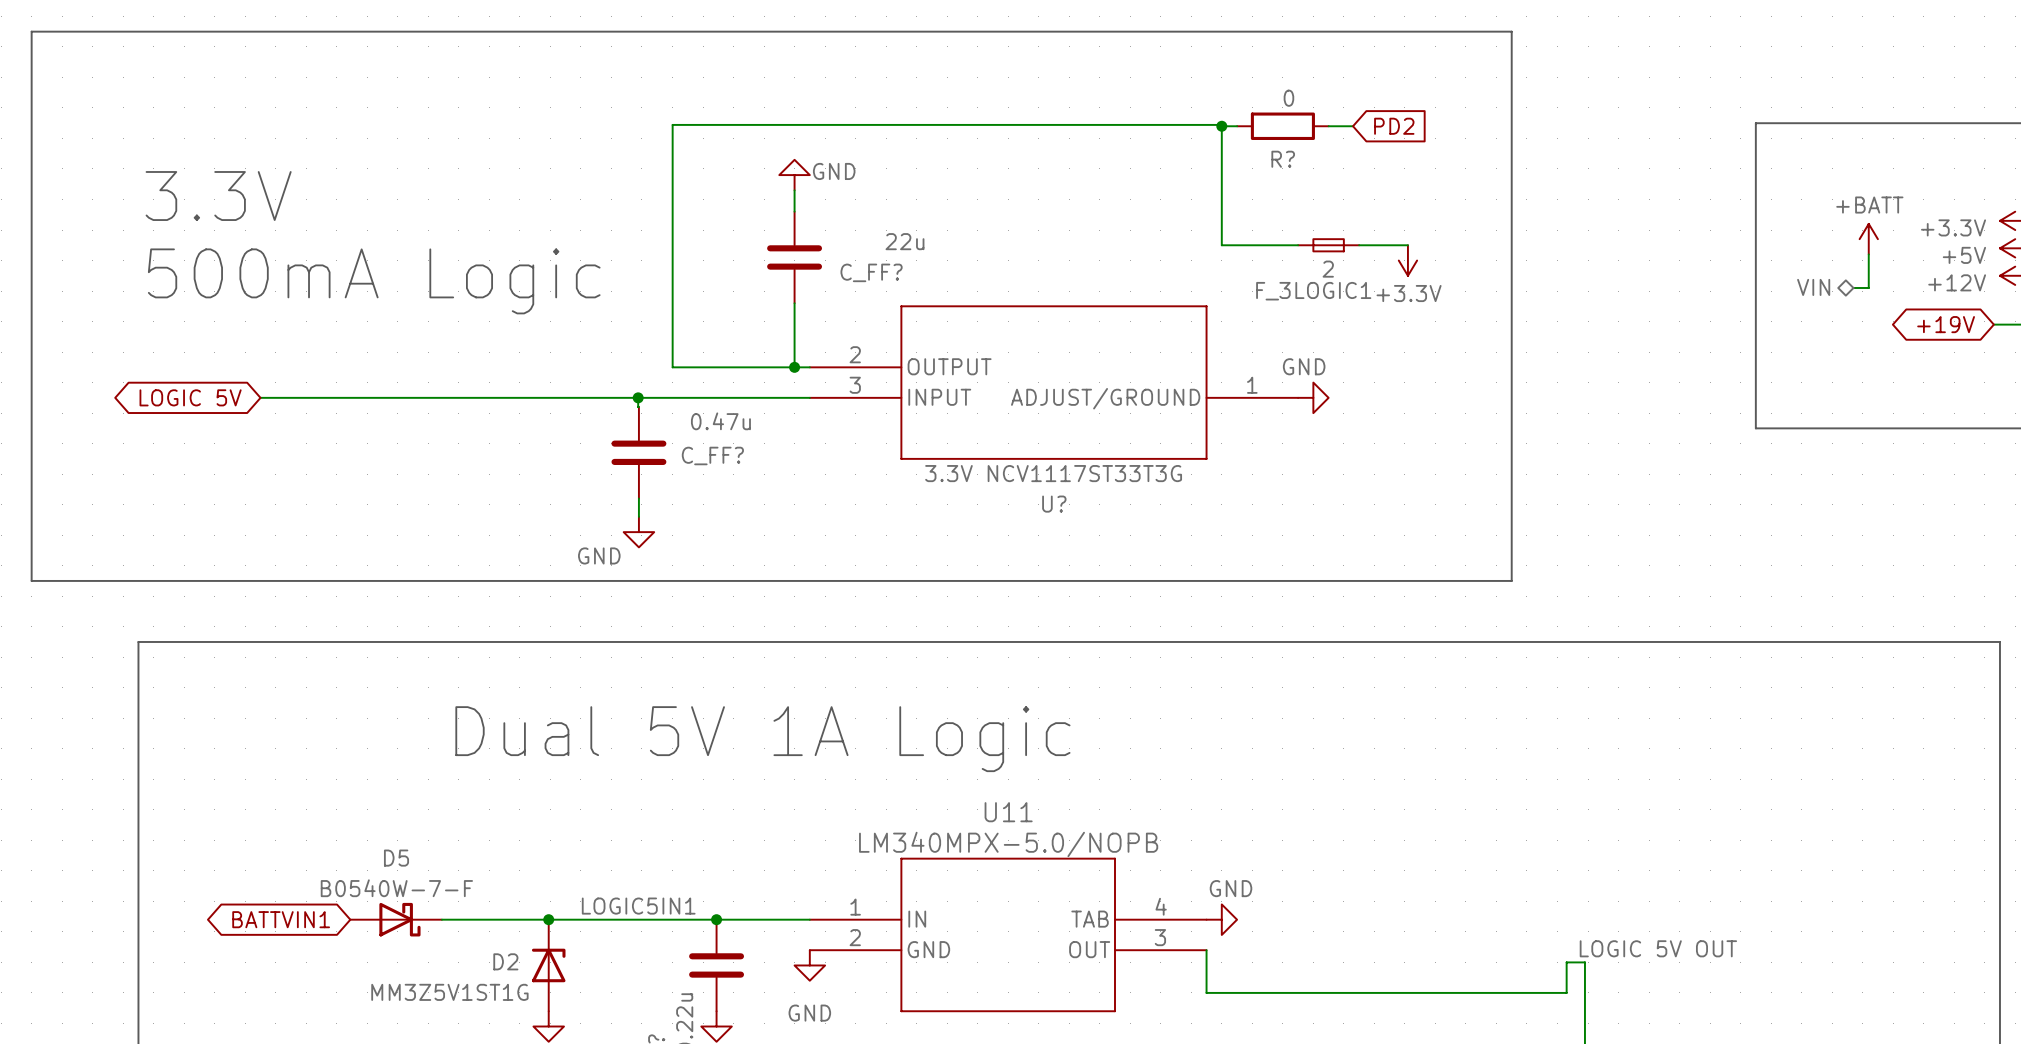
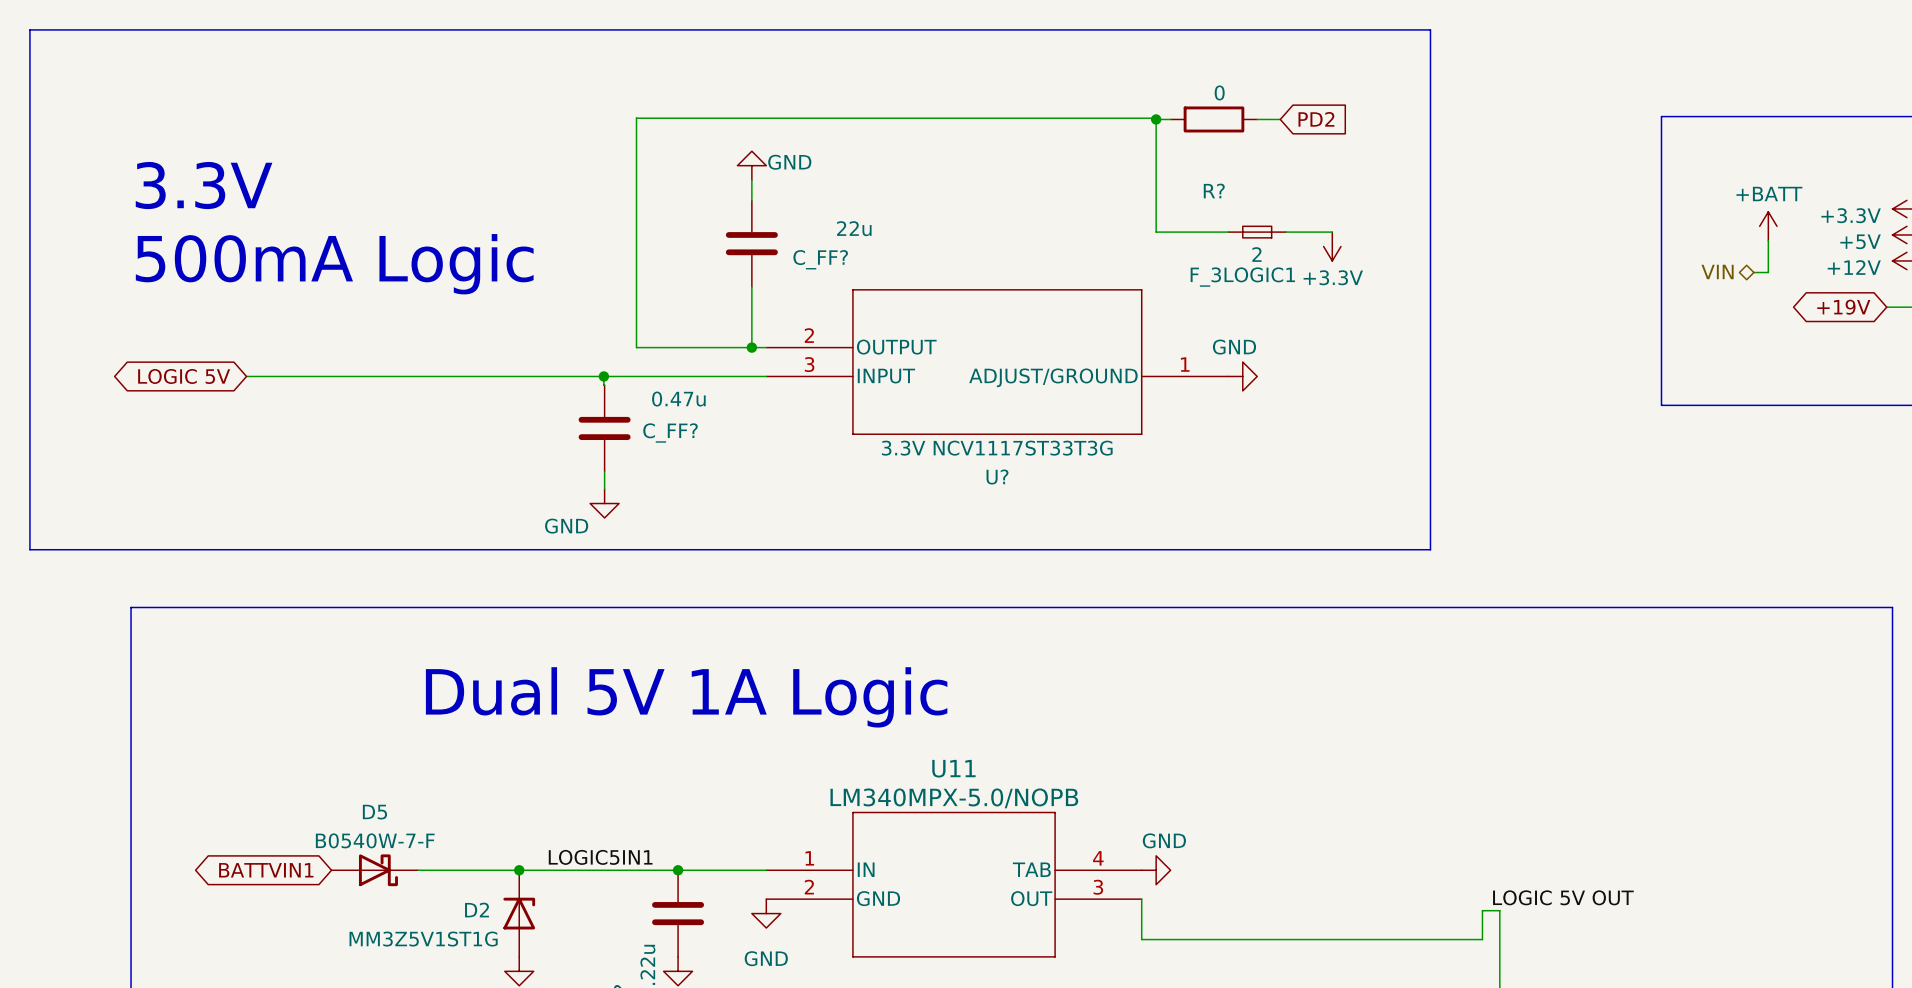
R? name position: R? (1283, 159) -> R? (1214, 190)

